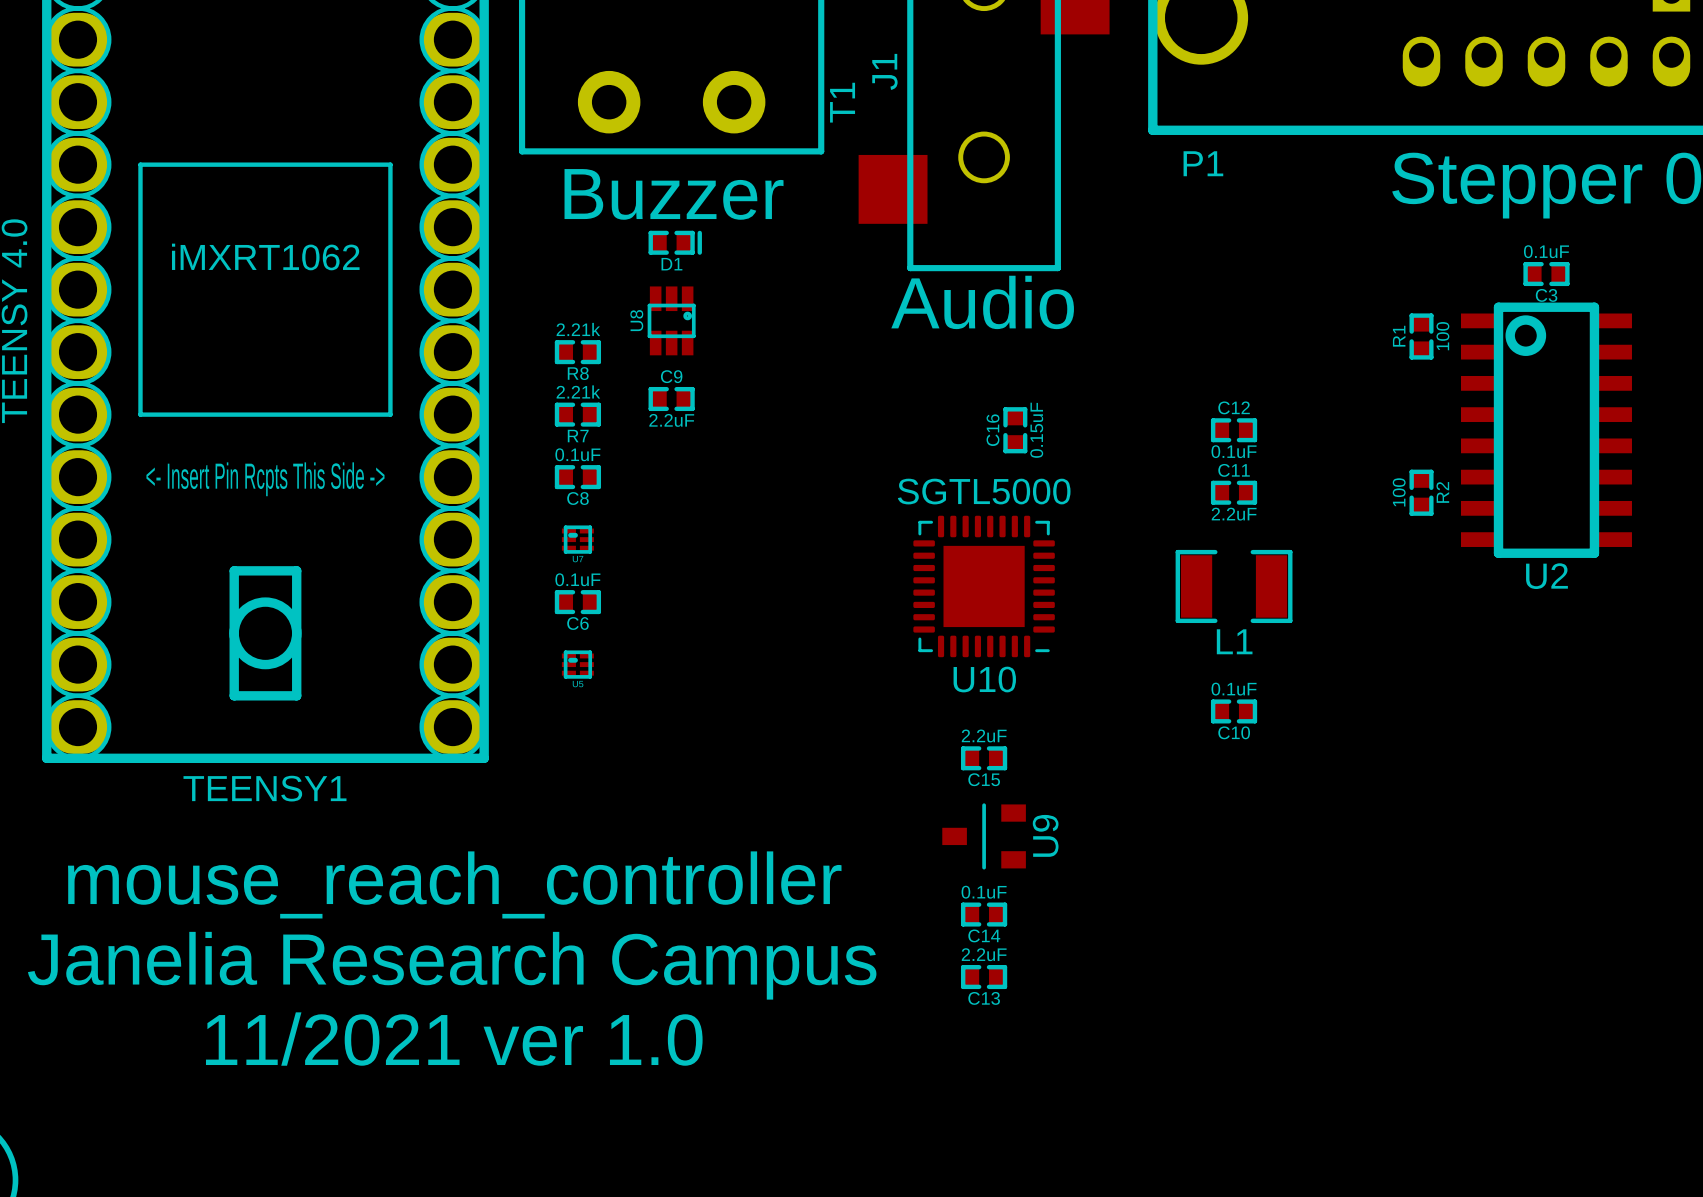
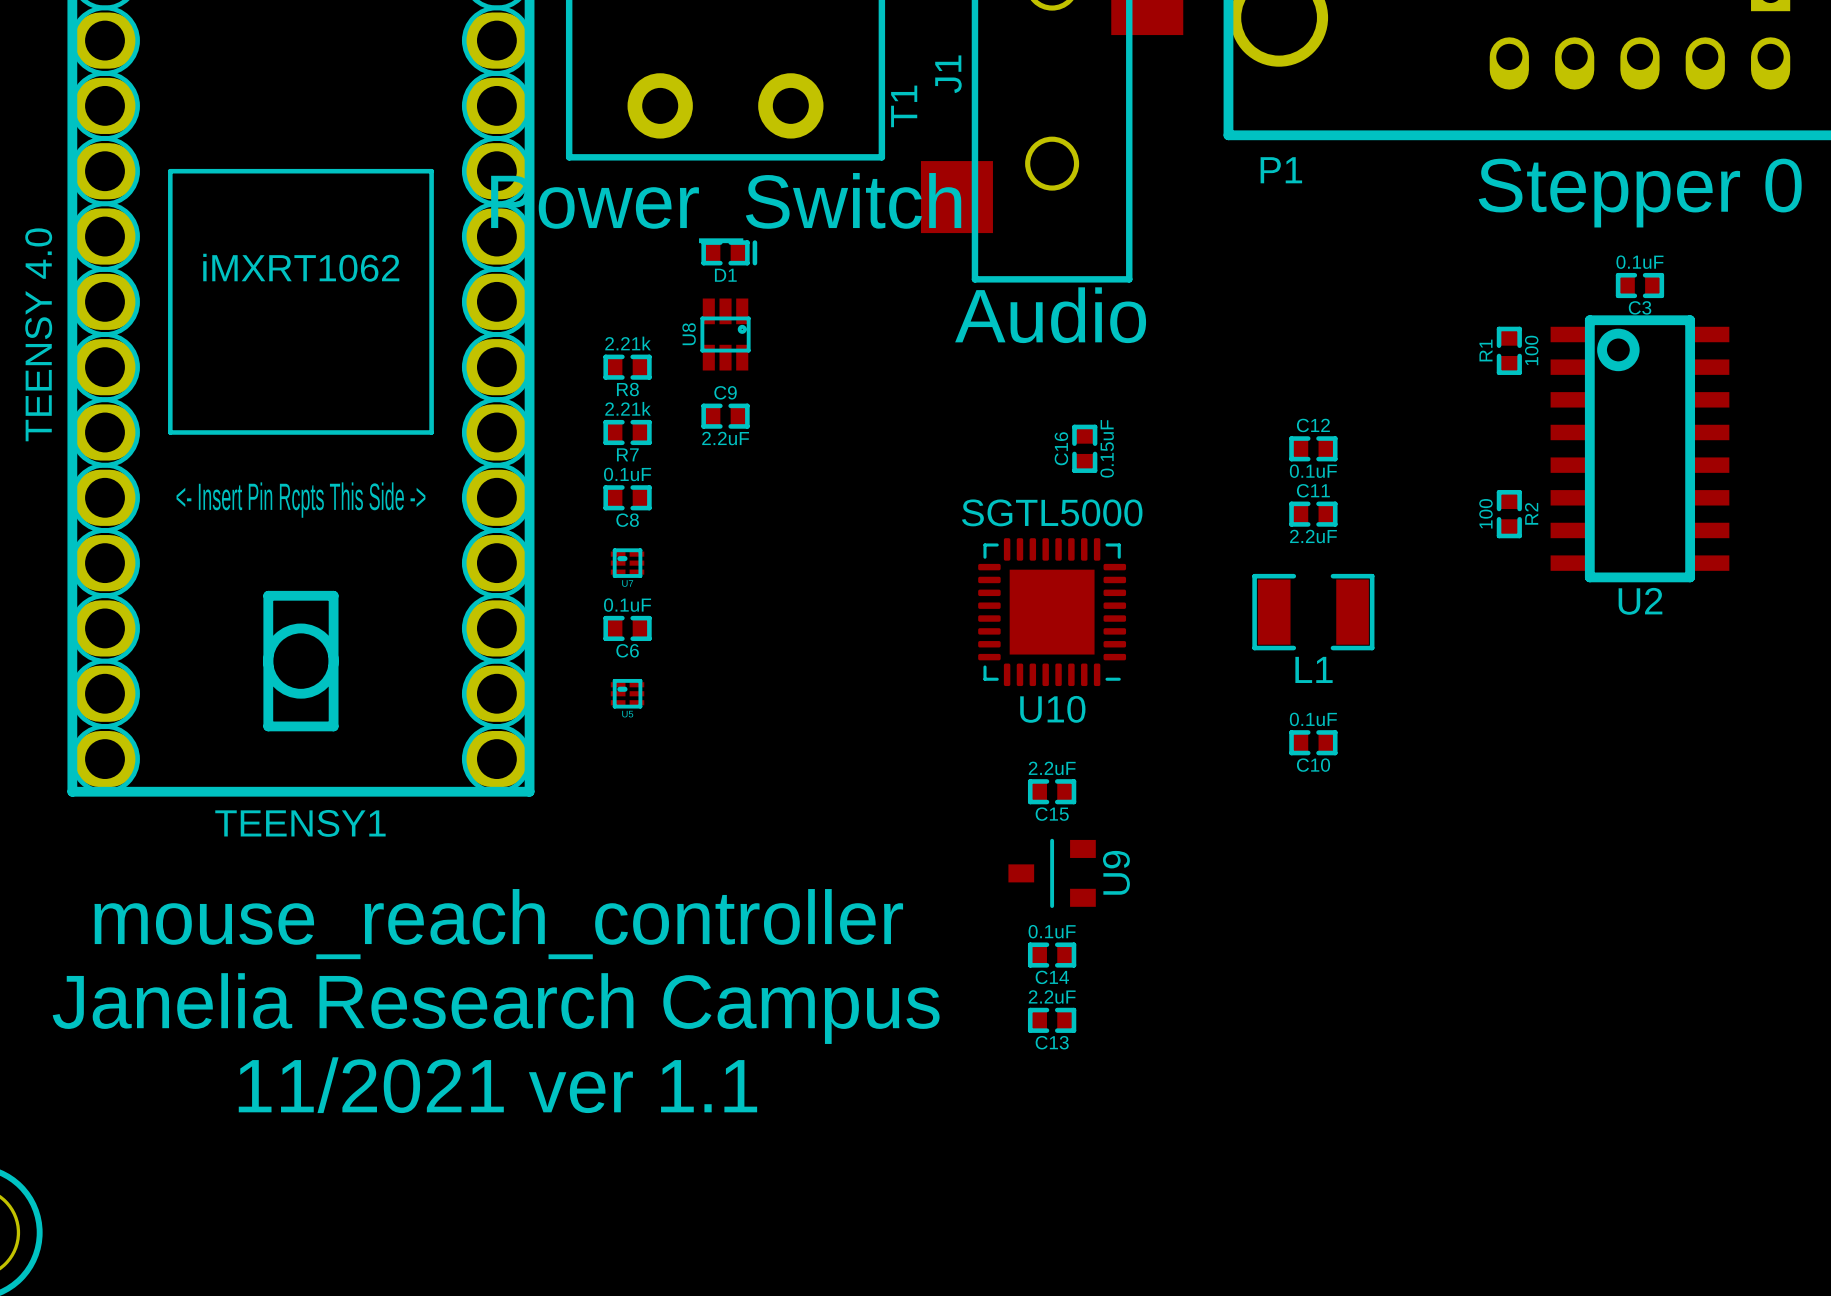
text: Buzzer (674, 194) -> Power_Switch (726, 208)
text: 11/2021 ver 1.0 (454, 1039) -> 11/2021 ver 1.1 (497, 1085)

